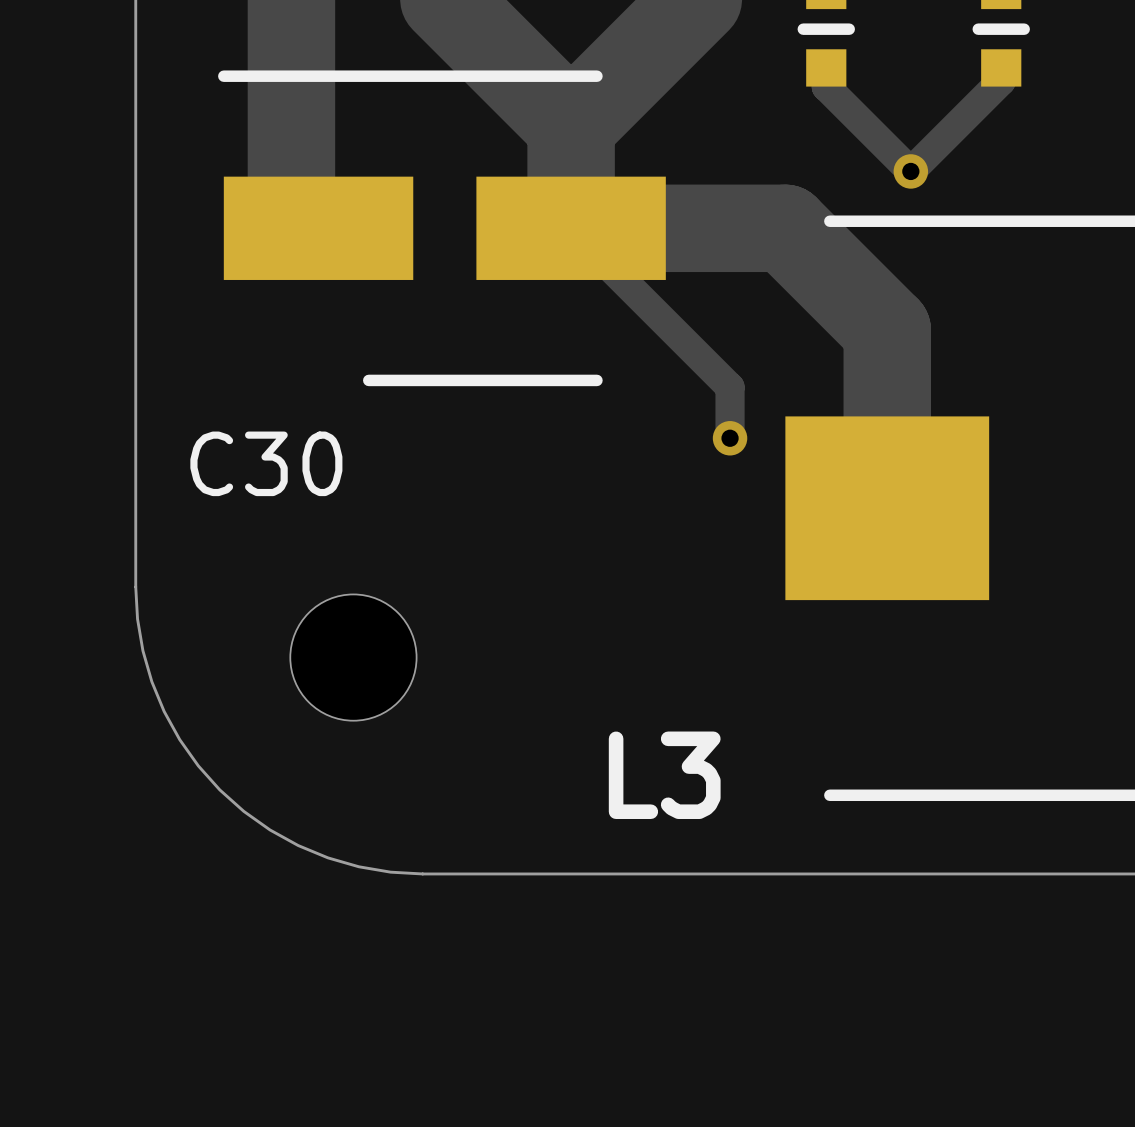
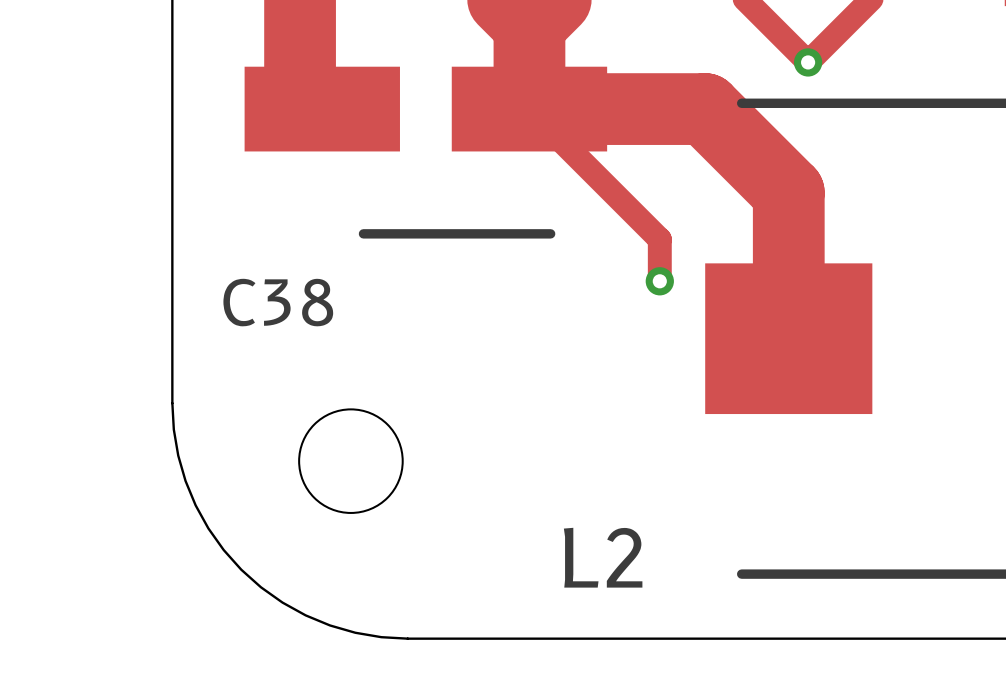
C30 name: C30 (266, 463) -> C38 (278, 302)
L3 name: L3 (664, 775) -> L2 (603, 557)

